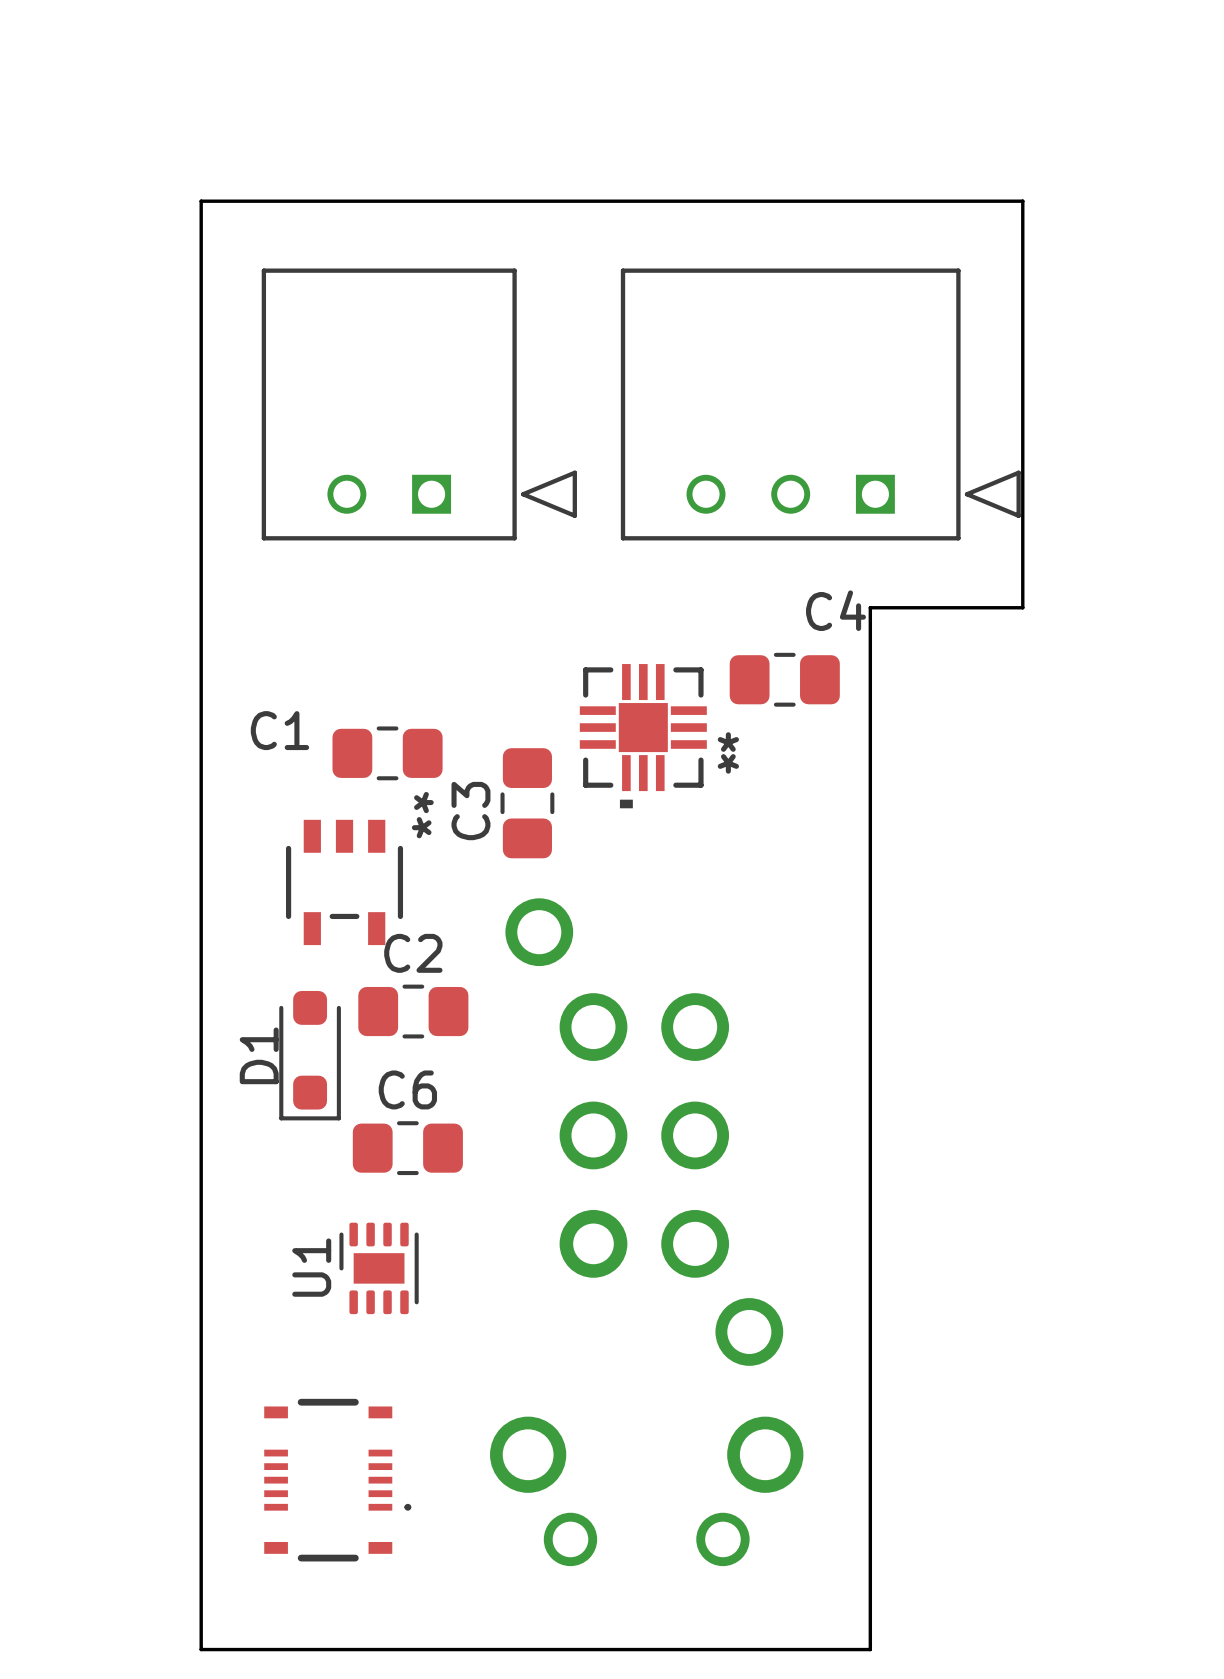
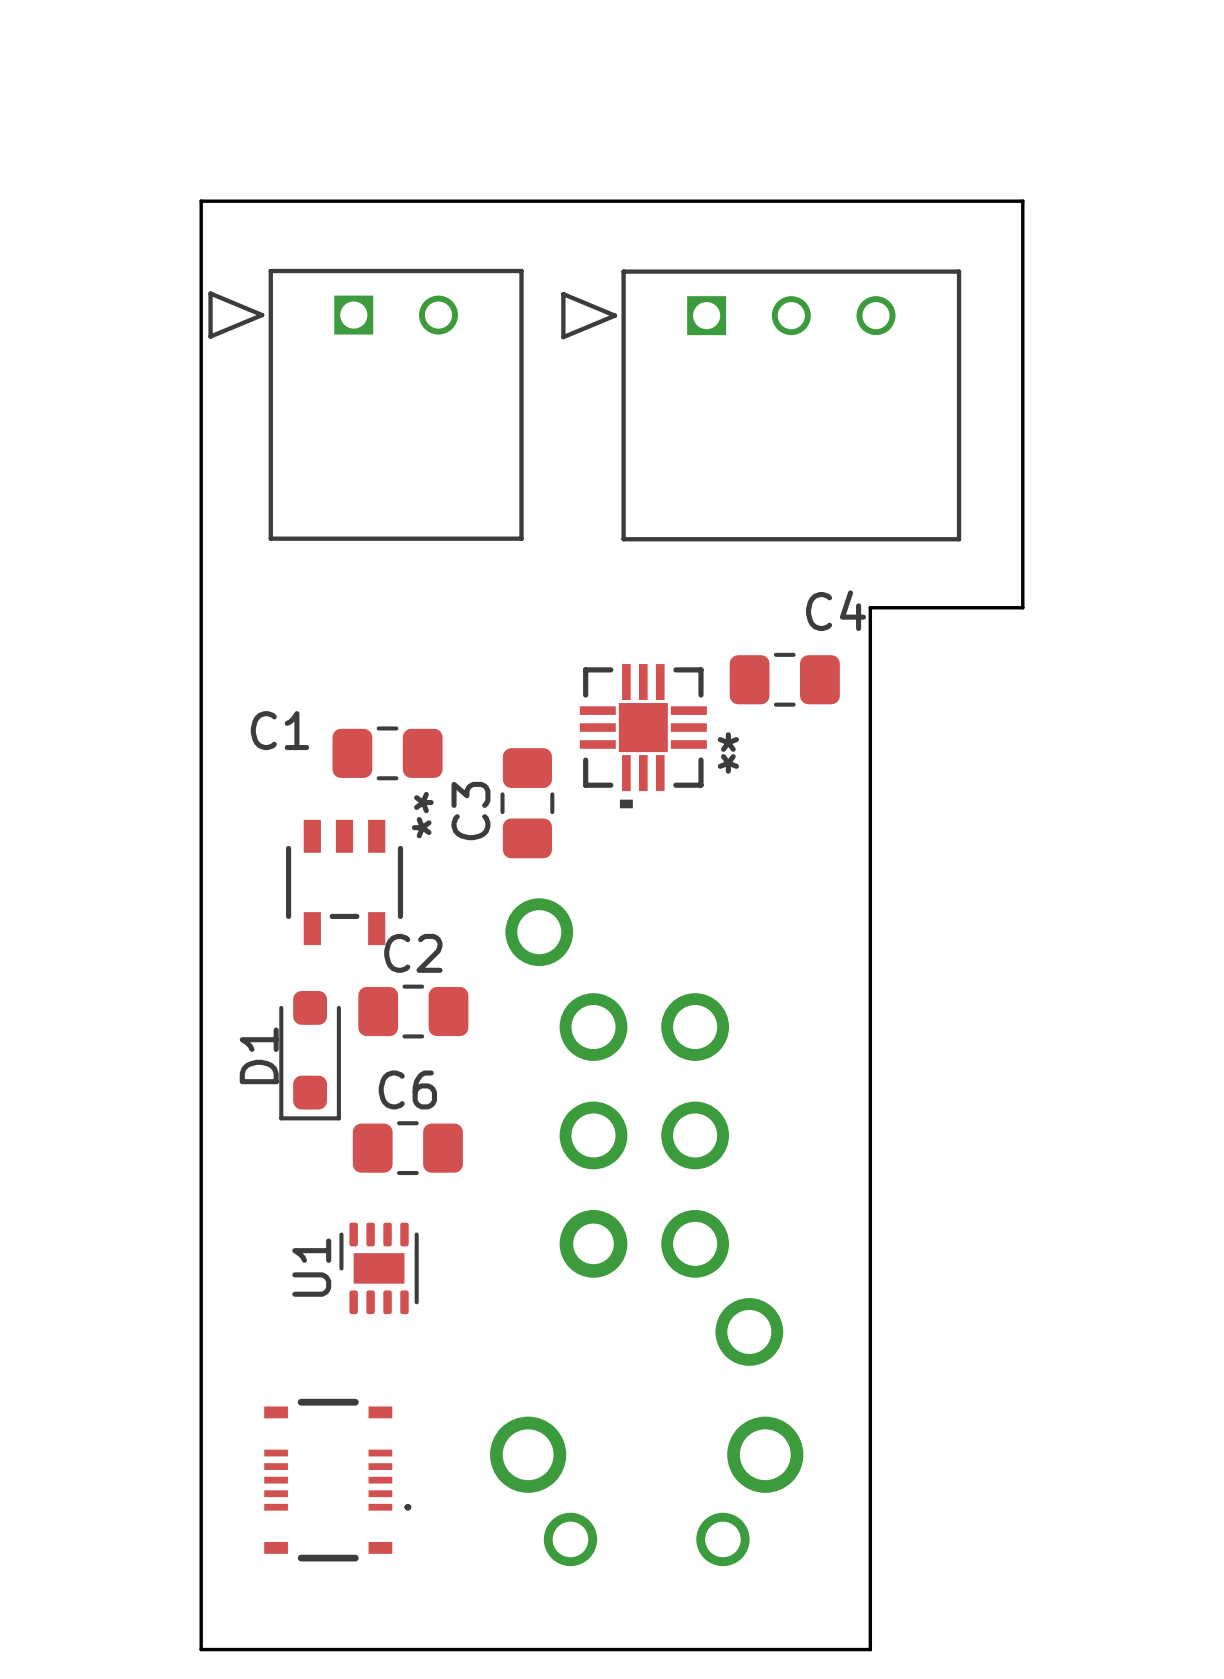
part rotation: 0° (419, 404) -> 180° (366, 404)
part rotation: 0° (820, 404) -> 180° (761, 405)

